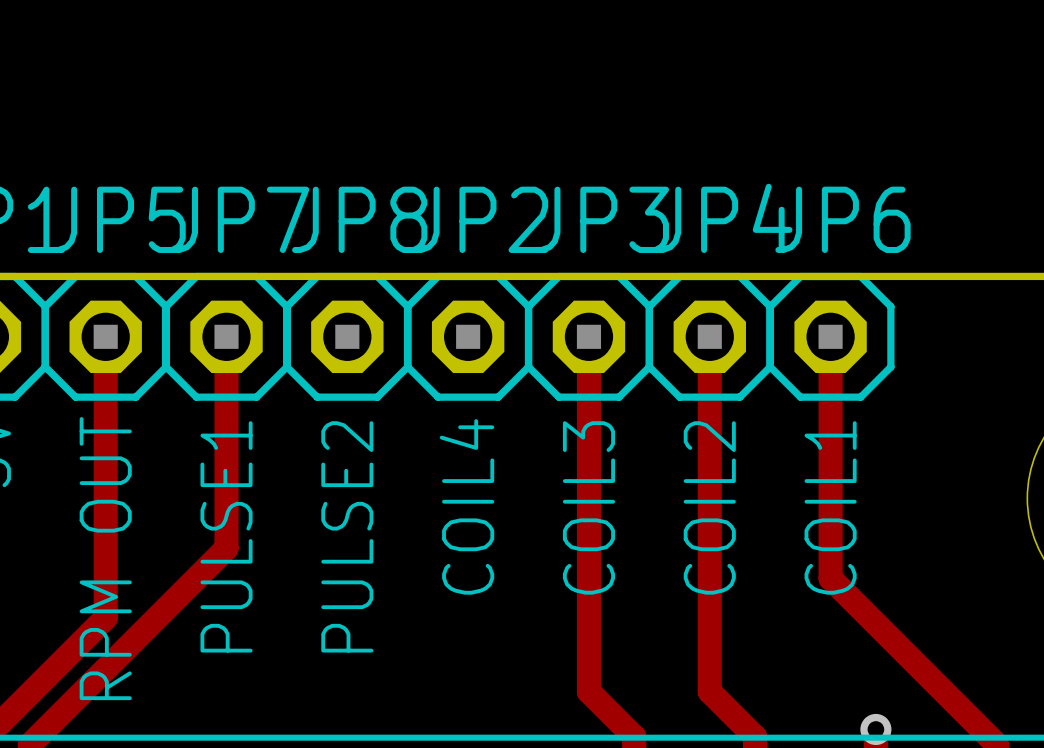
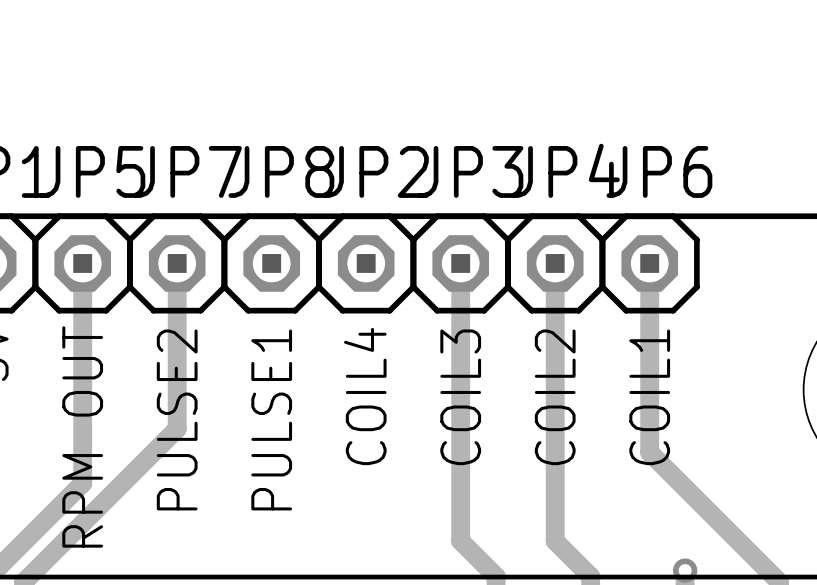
text: PULSE1 (226, 536) -> PULSE2 (177, 419)
text: PULSE2 (347, 536) -> PULSE1 (271, 419)

